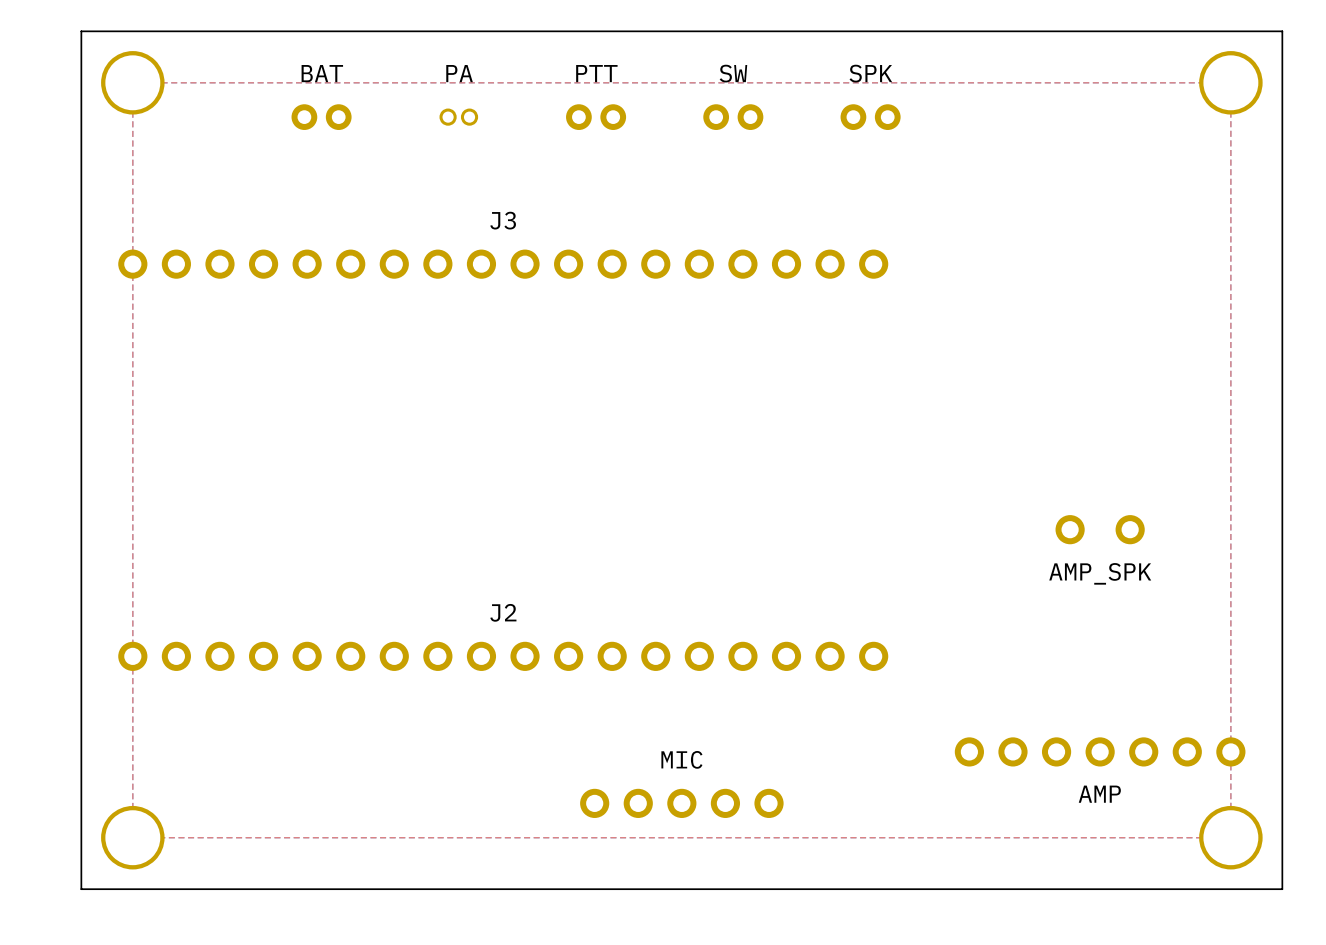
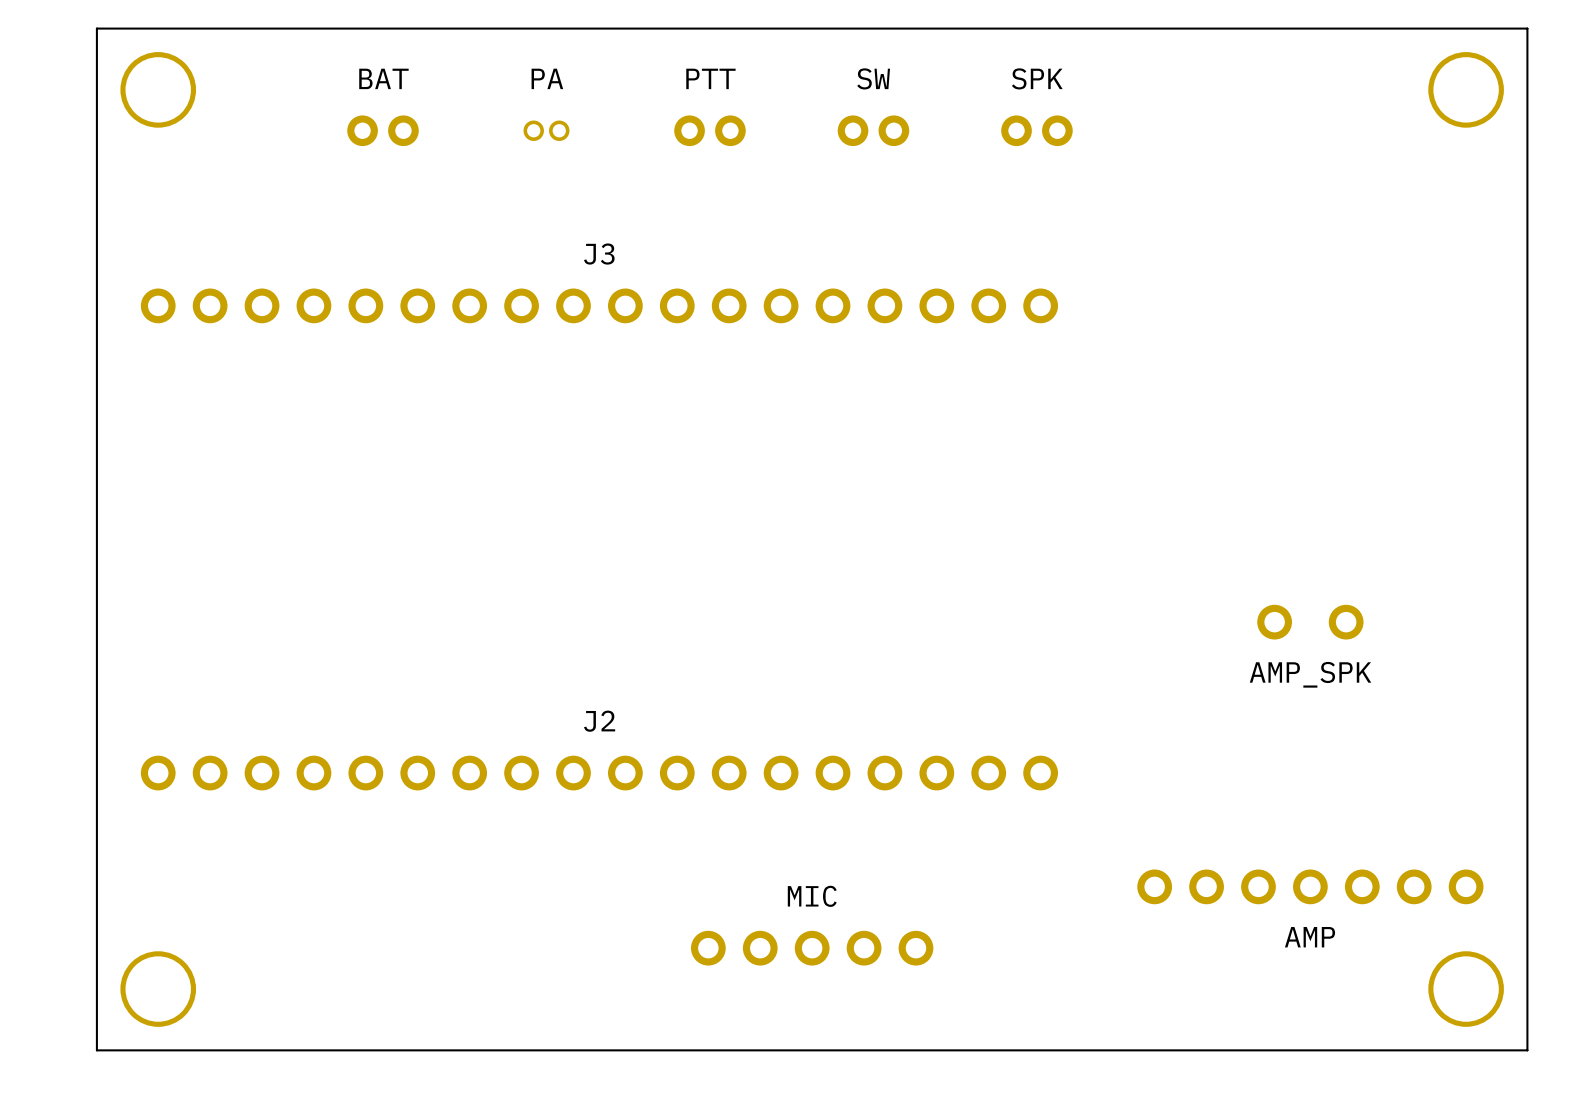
top zone outline: (132, 82) (1230, 82) (1230, 837) (132, 837) (132, 82) -> none

